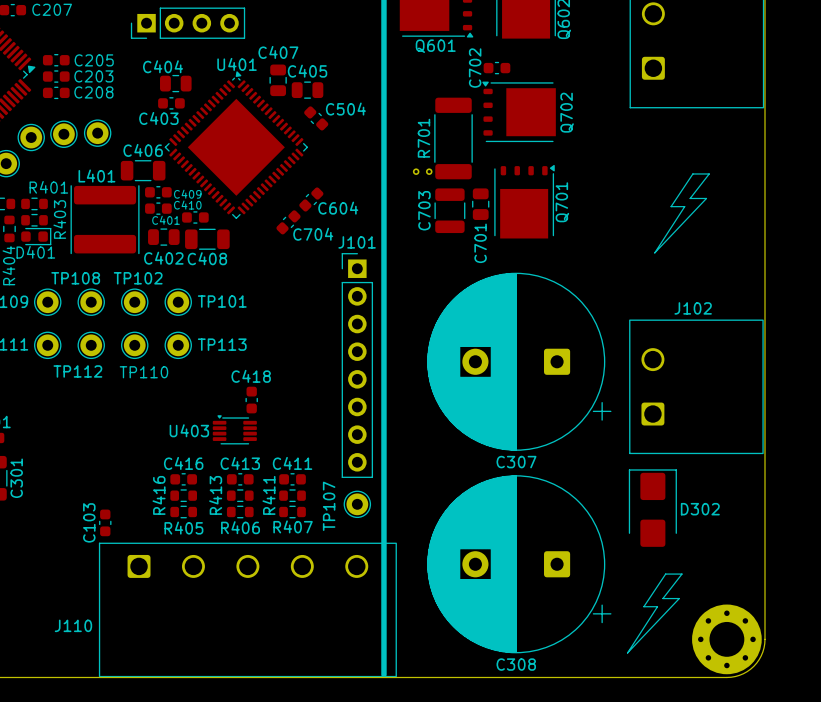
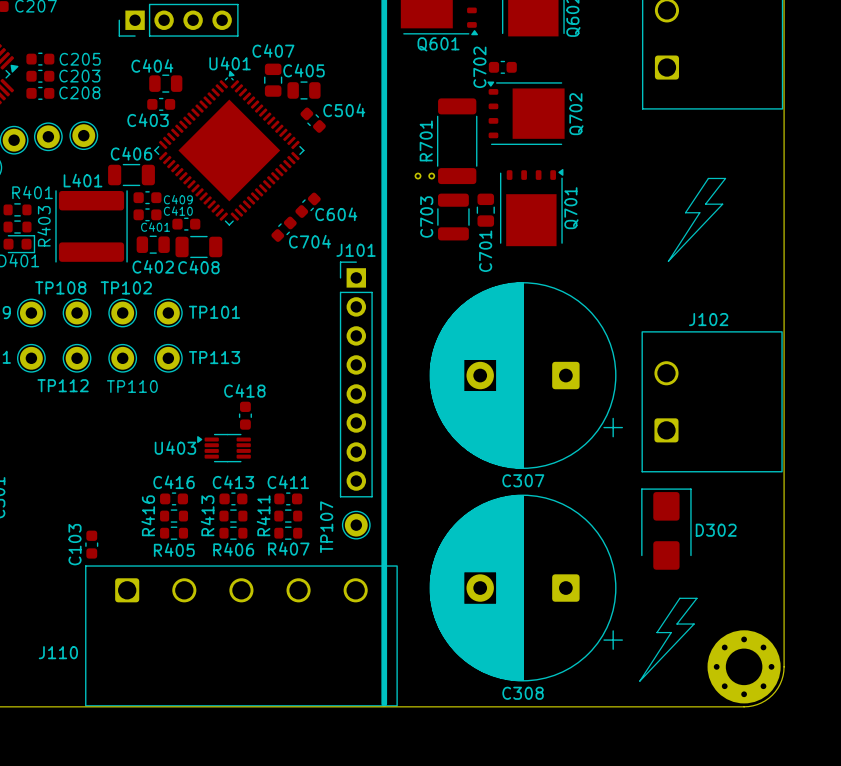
U403 footprint: [212, 415, 257, 445] -> [197, 433, 251, 463]

